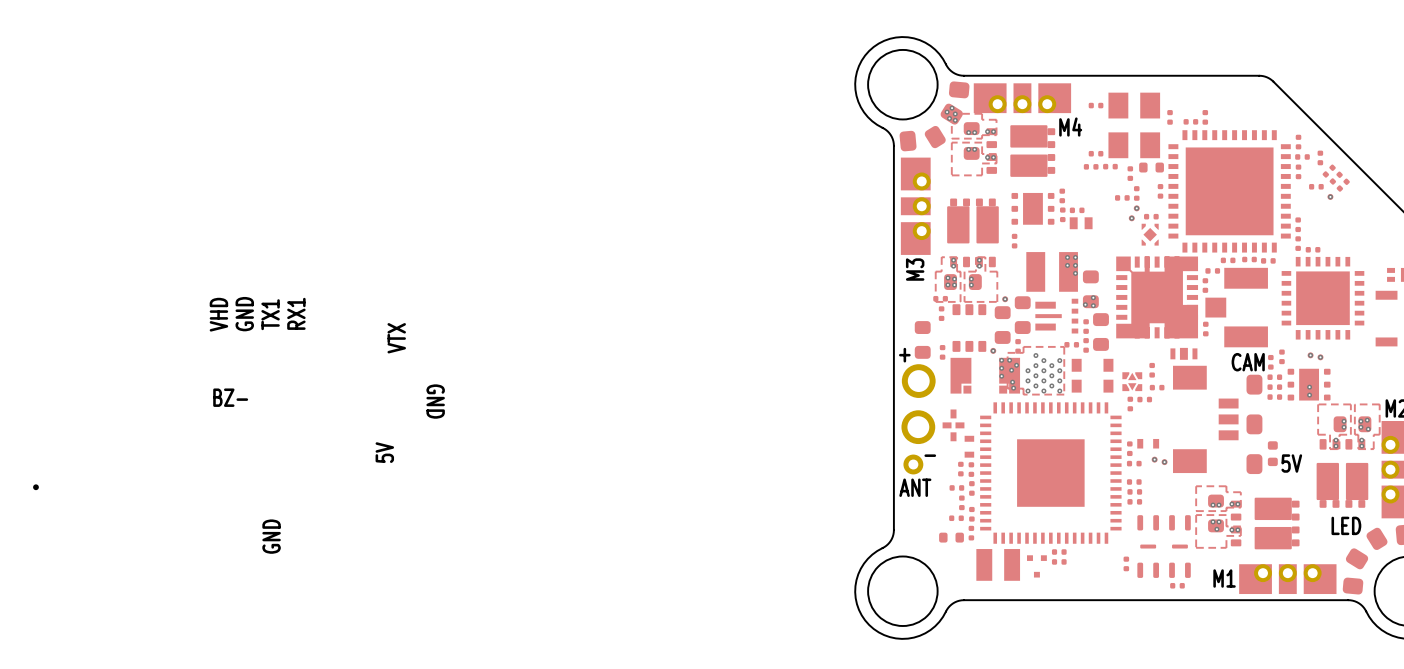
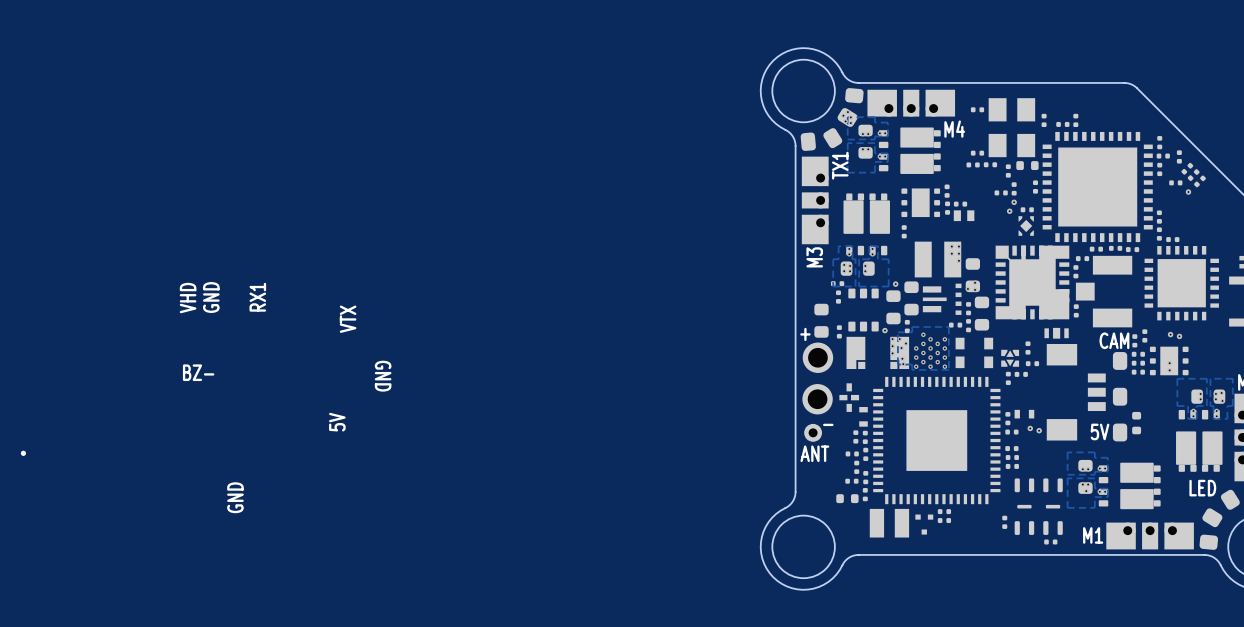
text: none -> TX1 (840, 165)
text: TX1 (270, 314) -> none
text position: 5V (1291, 463) -> 5V (1100, 431)

